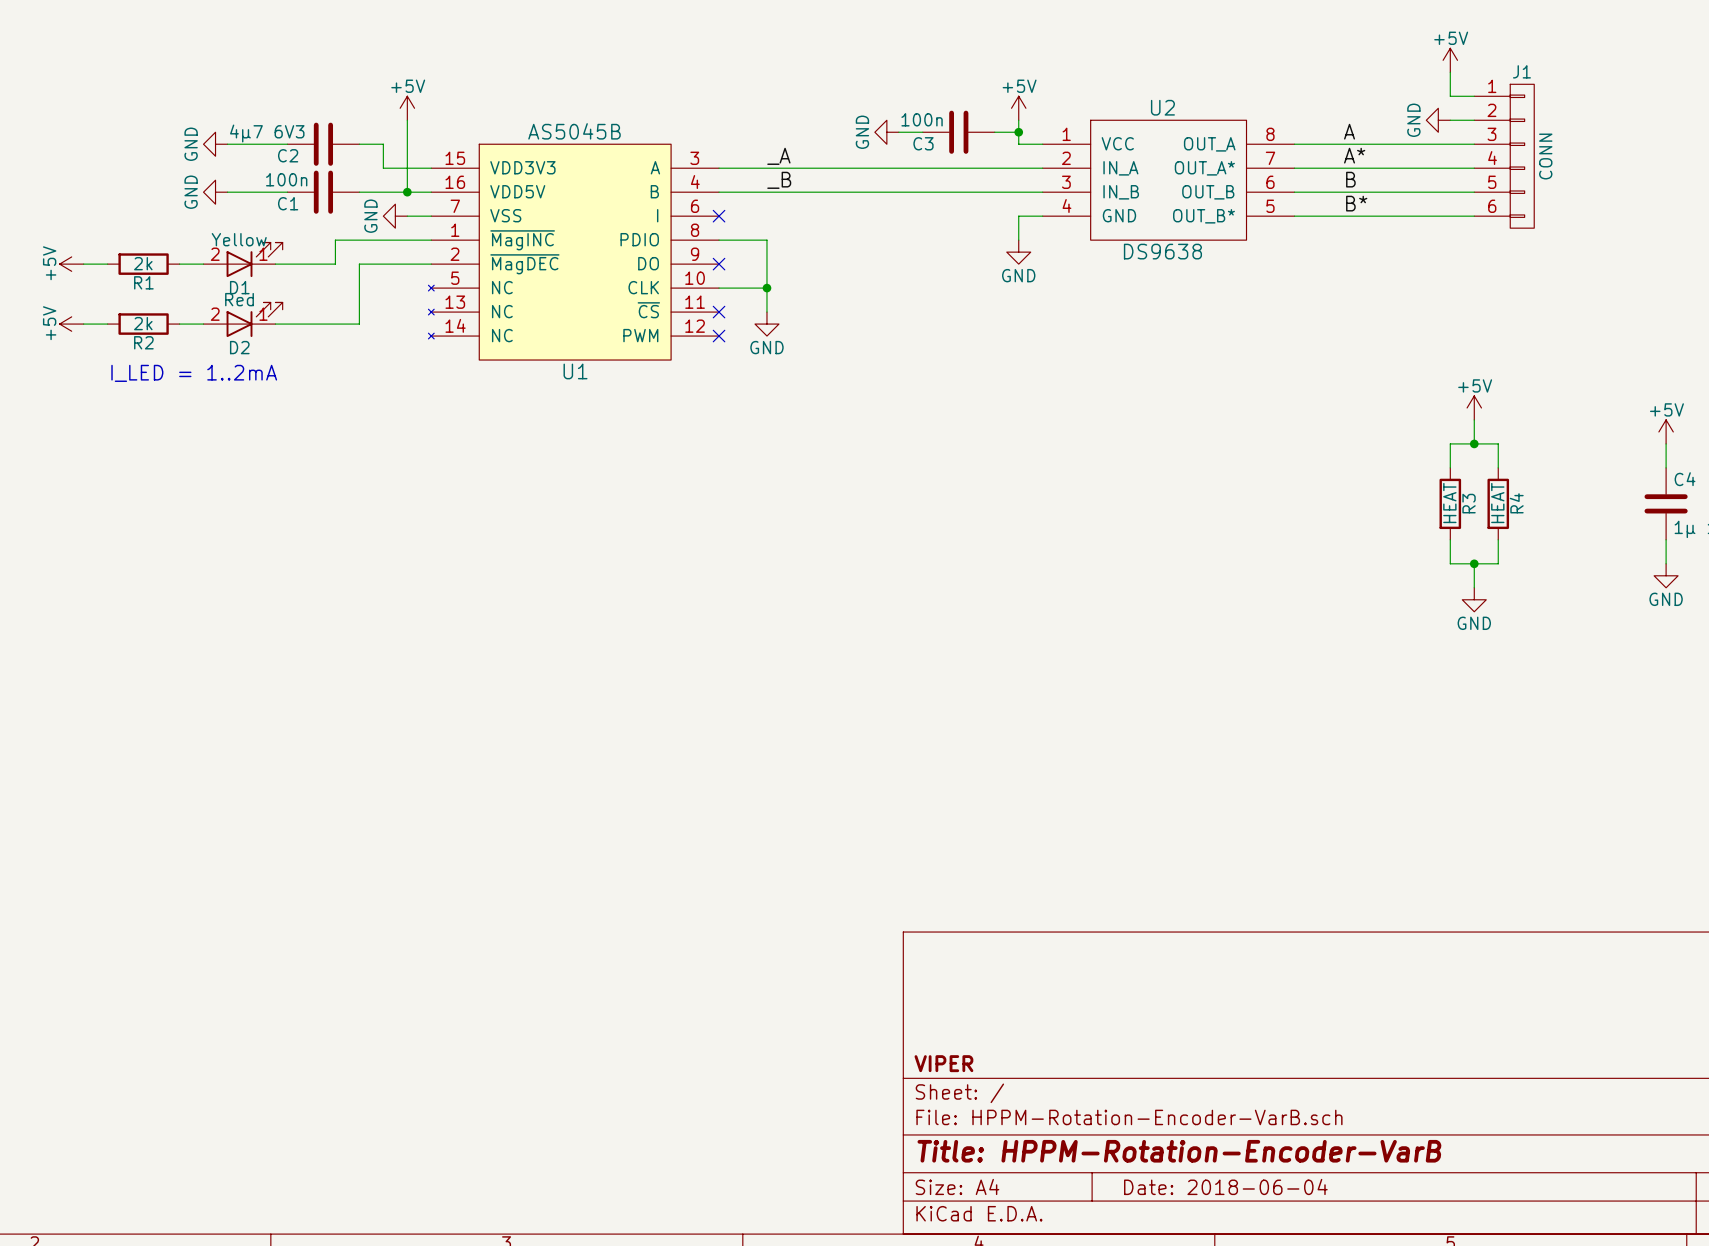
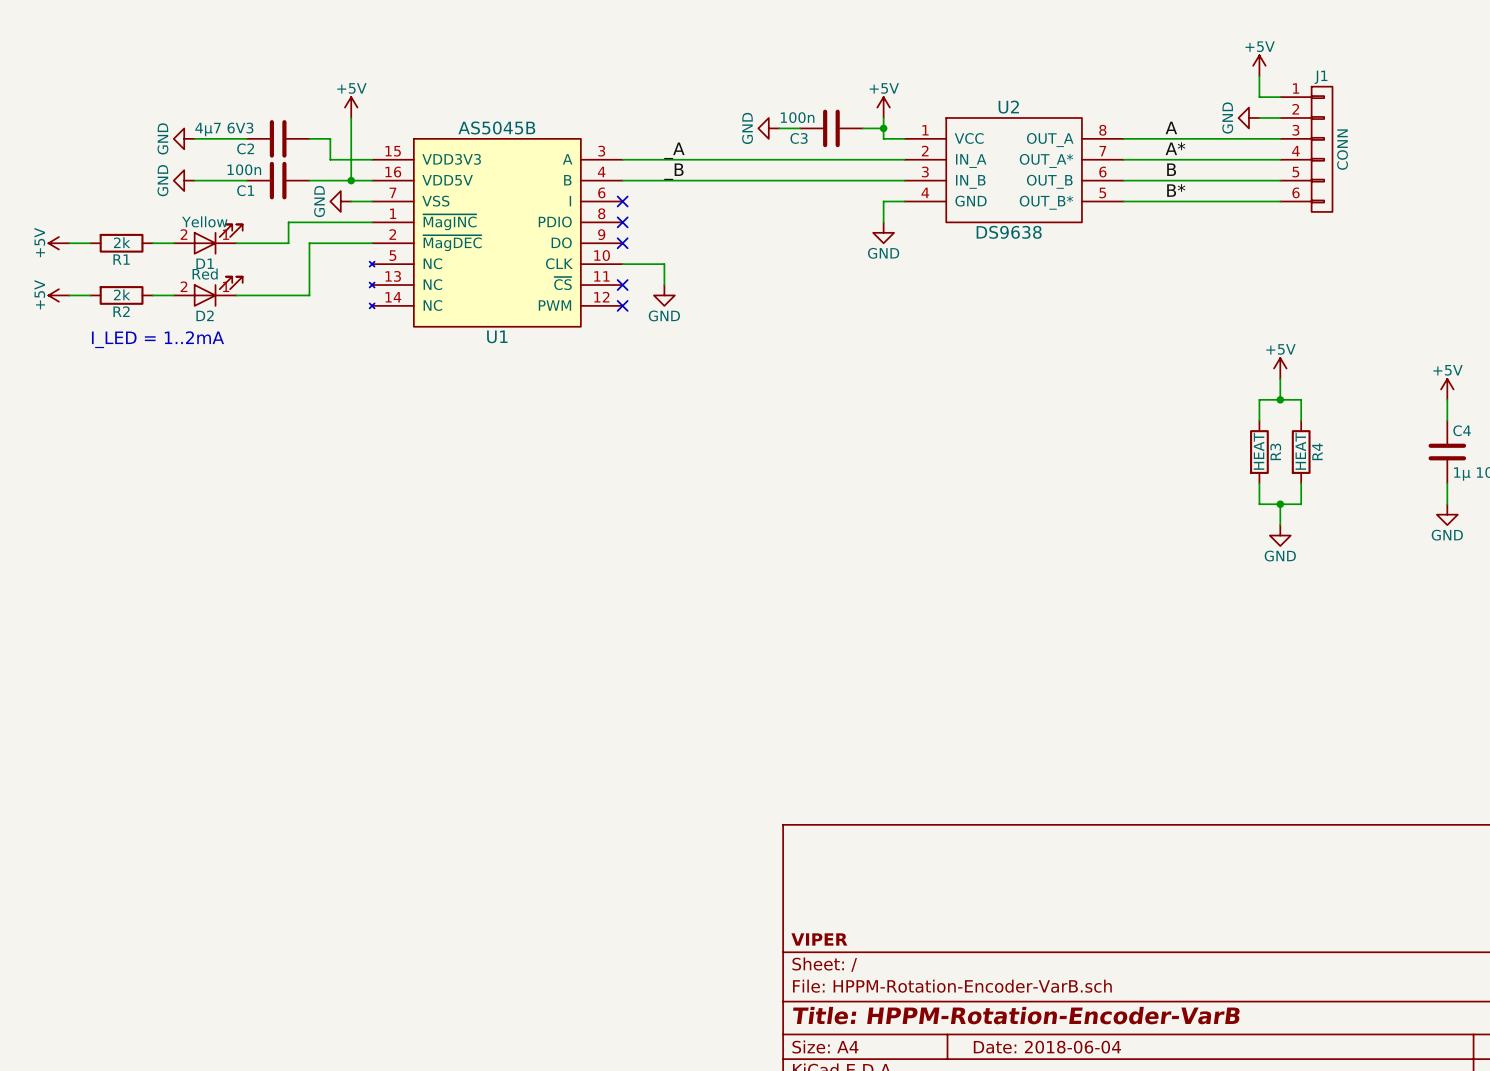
wire: (719, 240) (766, 240) (766, 288) -> none
no-connect mark: none -> (622, 222)
junction: (766, 288) -> none

